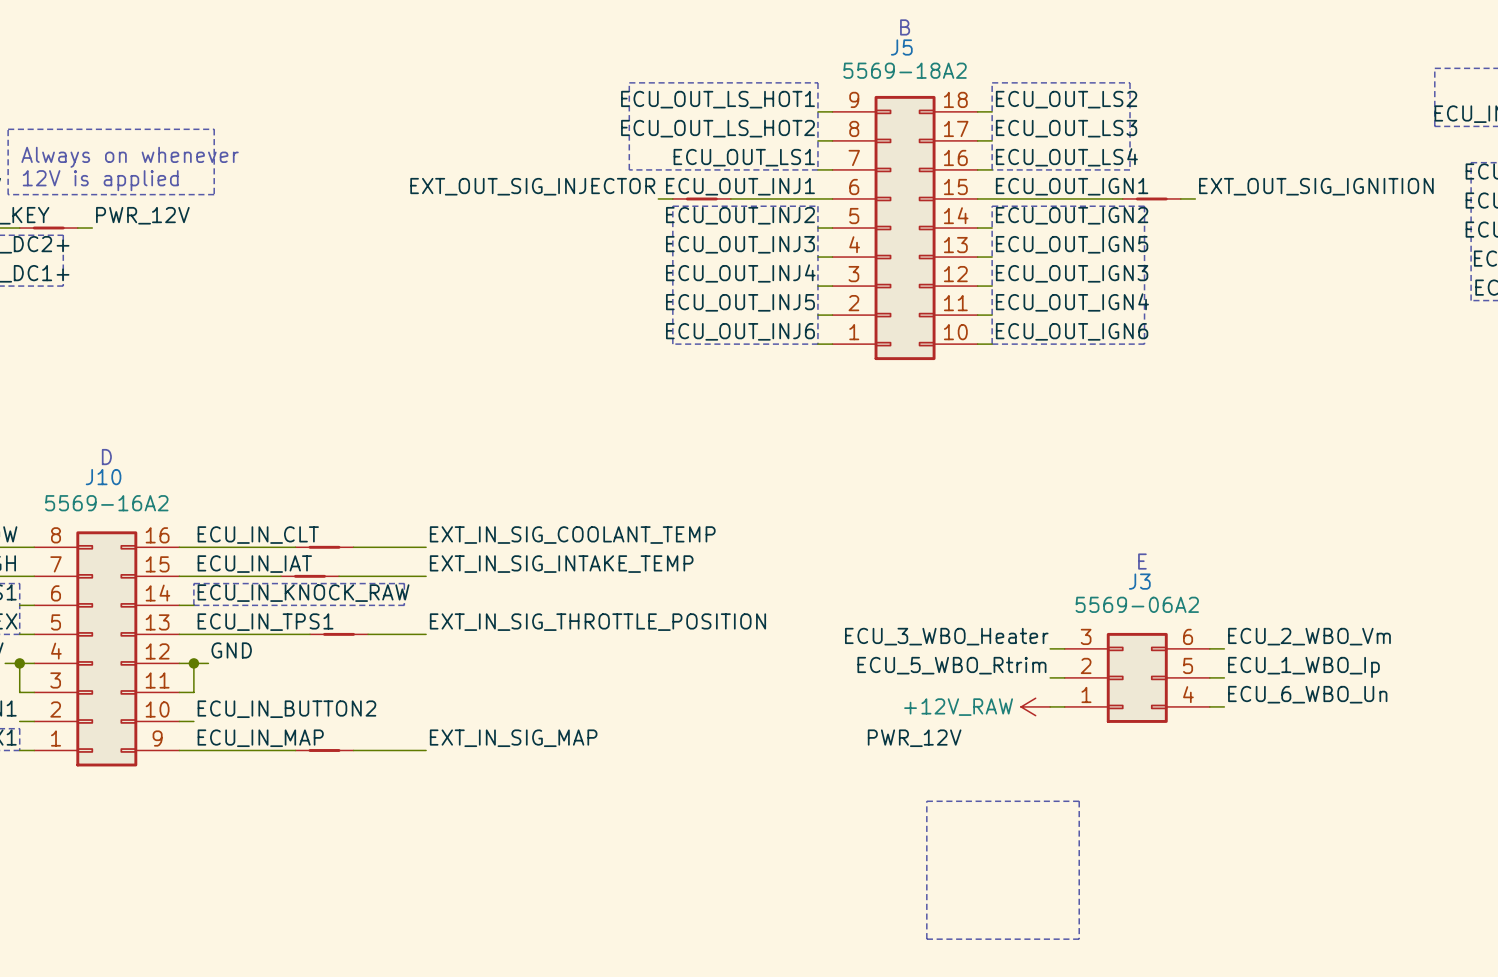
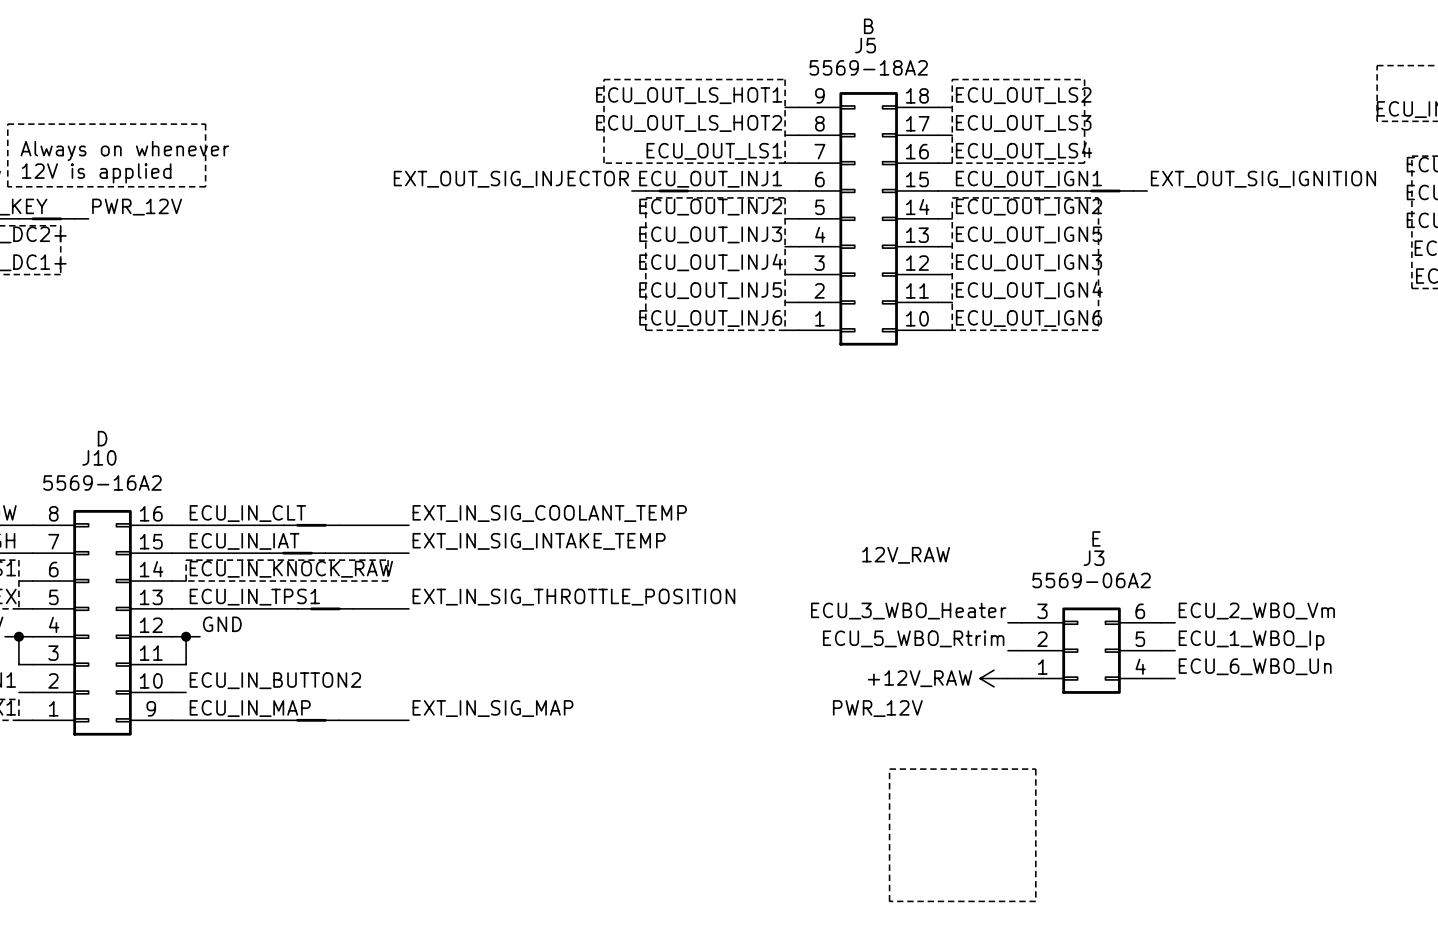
label: none -> 12V_RAW (906, 555)

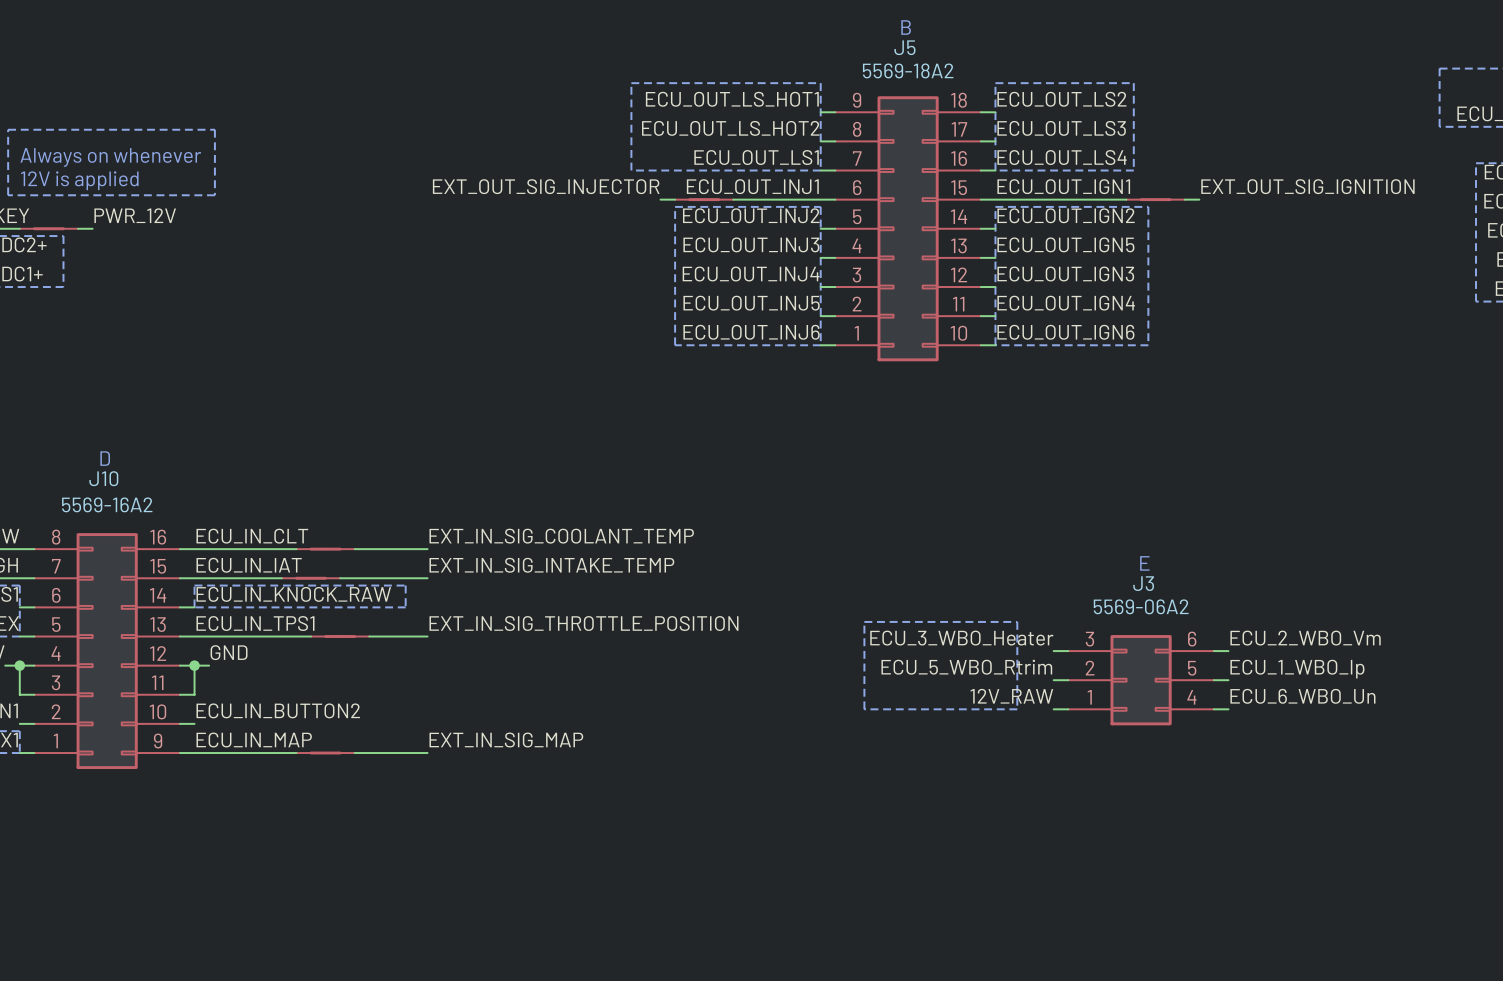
label position: 12V_RAW (906, 555) -> 12V_RAW (1011, 696)
line: none -> (864, 621) (1017, 621) (1017, 709) (864, 709) (864, 621)
power symbol: +12V_RAW (994, 678) -> none
label: PWR_12V (877, 708) -> none
line: (889, 769) (1035, 769) (1035, 901) (889, 901) (889, 769) -> none

